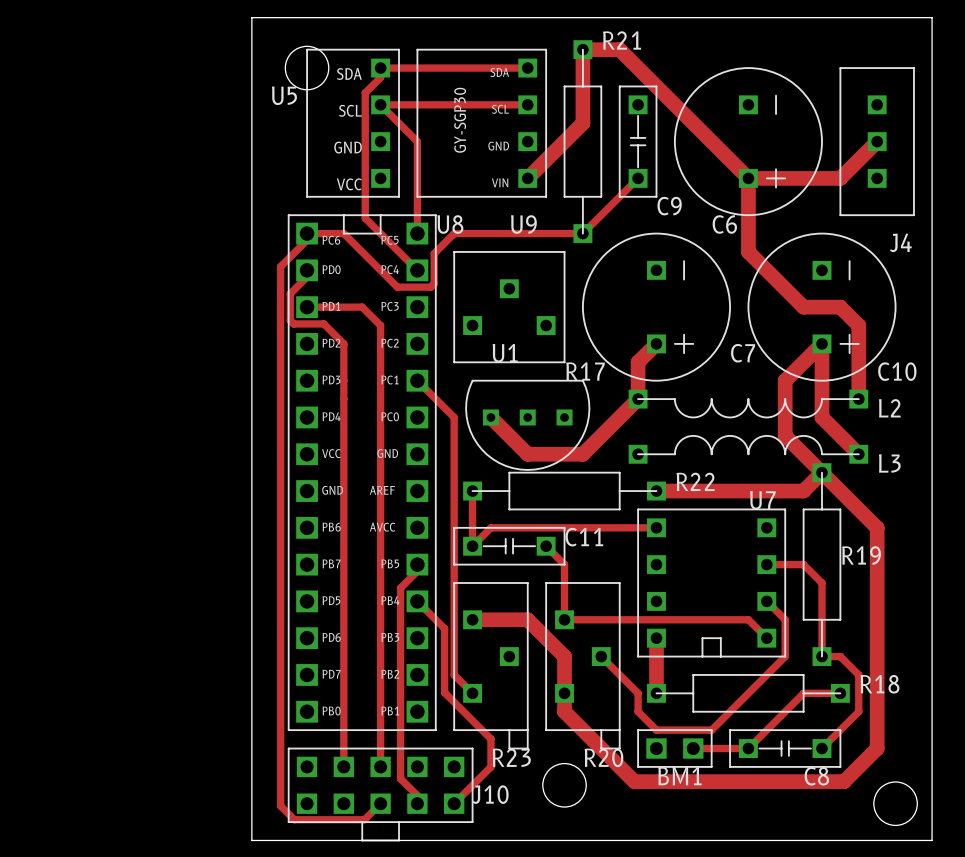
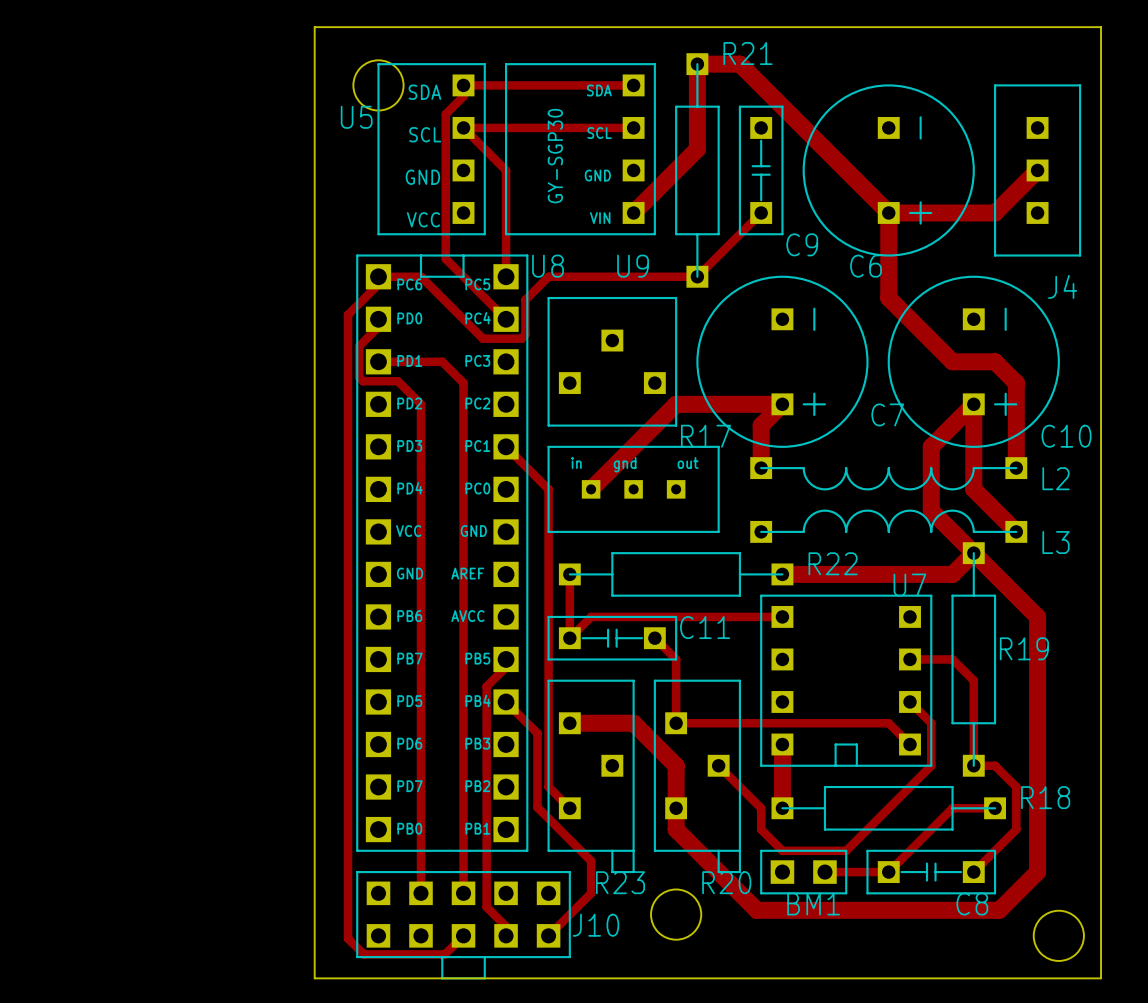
track: (638, 399) (582, 454) (527, 454) (490, 417) -> (782, 404) (676, 404) (591, 489)
part: none -> (633, 489)
U1: (527, 425) -> none

